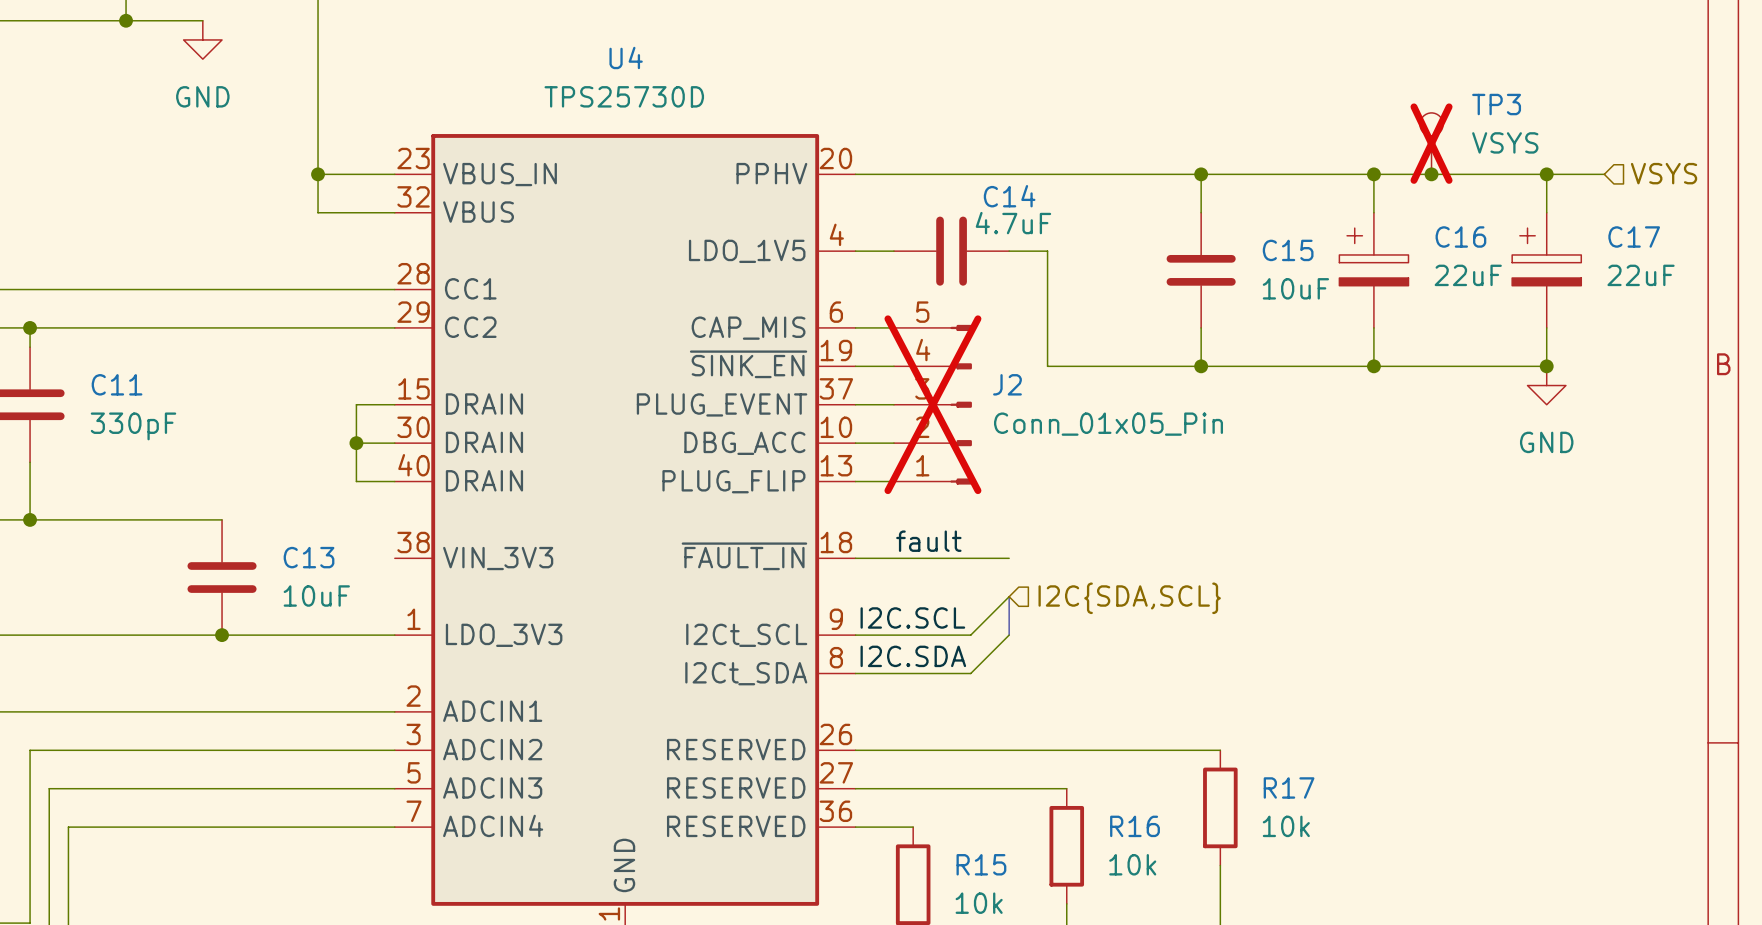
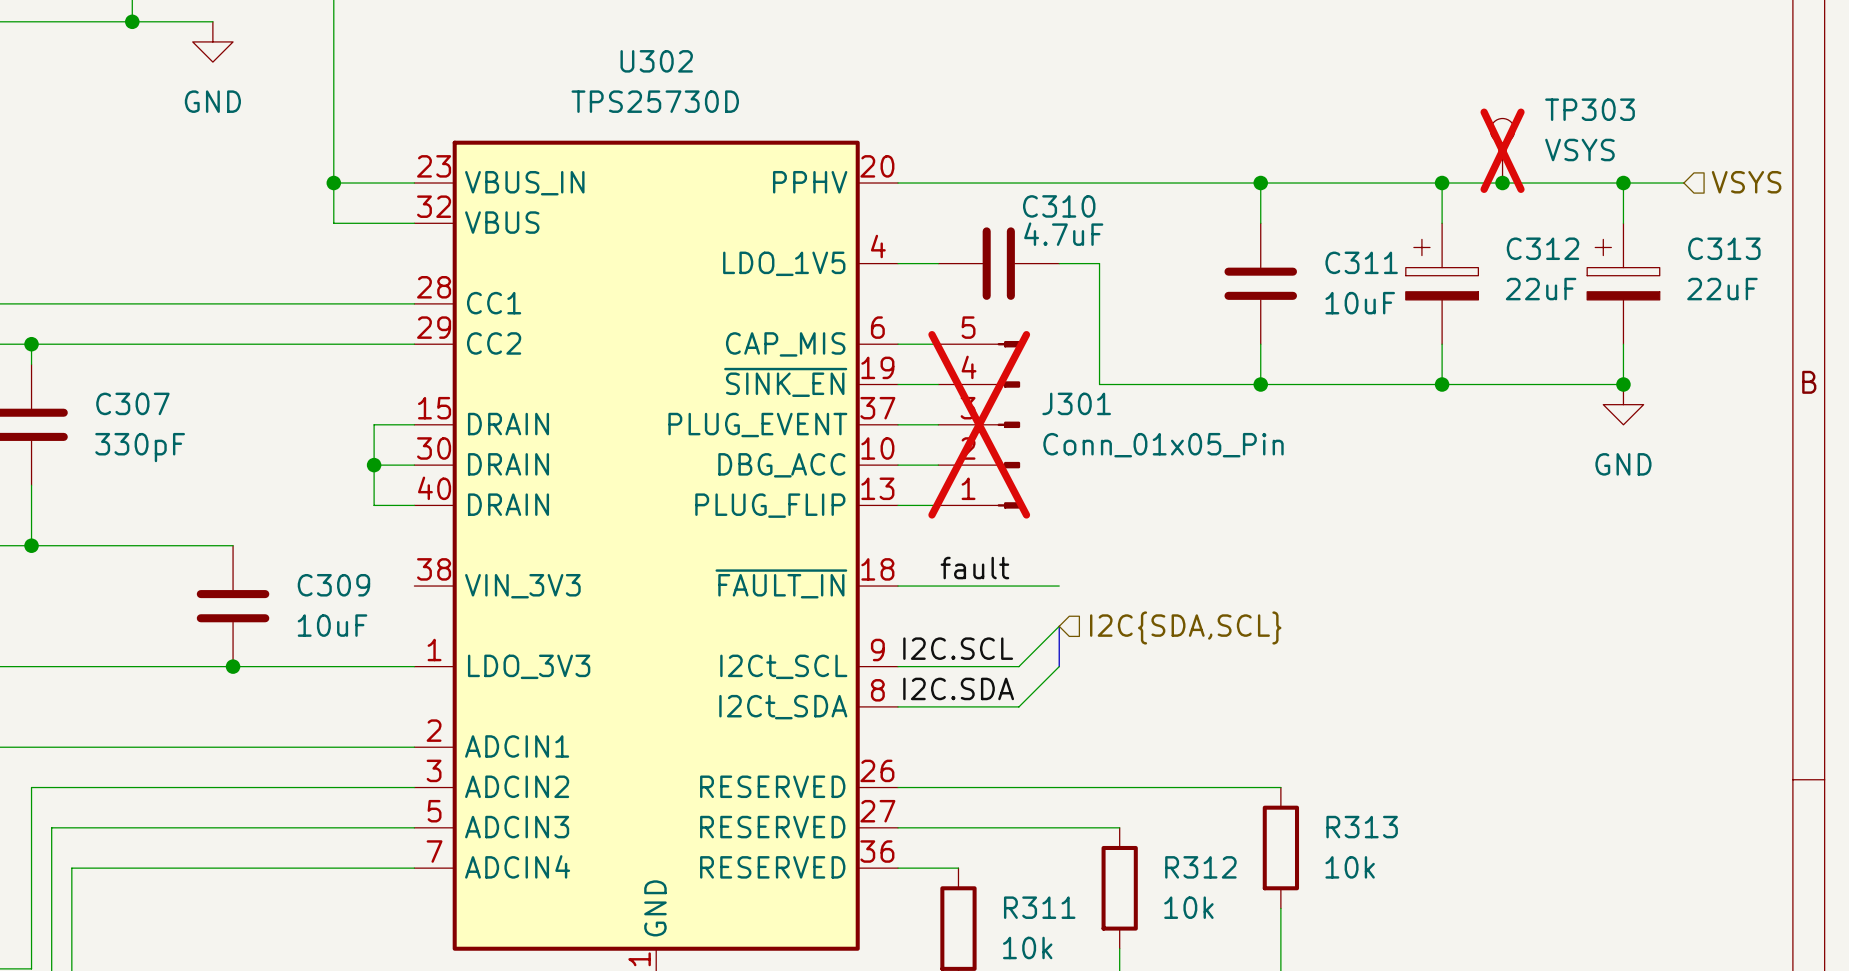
U4 name: U4 (626, 57) -> U302 (656, 61)
TP3 name: TP3 (1496, 104) -> TP303 (1590, 109)
C14 name: C14 (1009, 196) -> C310 (1059, 206)
C16 name: C16 (1460, 236) -> C312 (1543, 248)
C17 name: C17 (1634, 236) -> C313 (1724, 248)
C15 name: C15 (1288, 250) -> C311 (1361, 262)
C11 name: C11 (117, 384) -> C307 (132, 403)
J2 name: J2 (1007, 384) -> J301 (1076, 403)
C13 name: C13 (309, 557) -> C309 (333, 585)
R17 name: R17 (1289, 787) -> R313 (1362, 827)
R16 name: R16 (1135, 826) -> R312 (1200, 867)
R15 name: R15 (981, 864) -> R311 (1039, 907)

